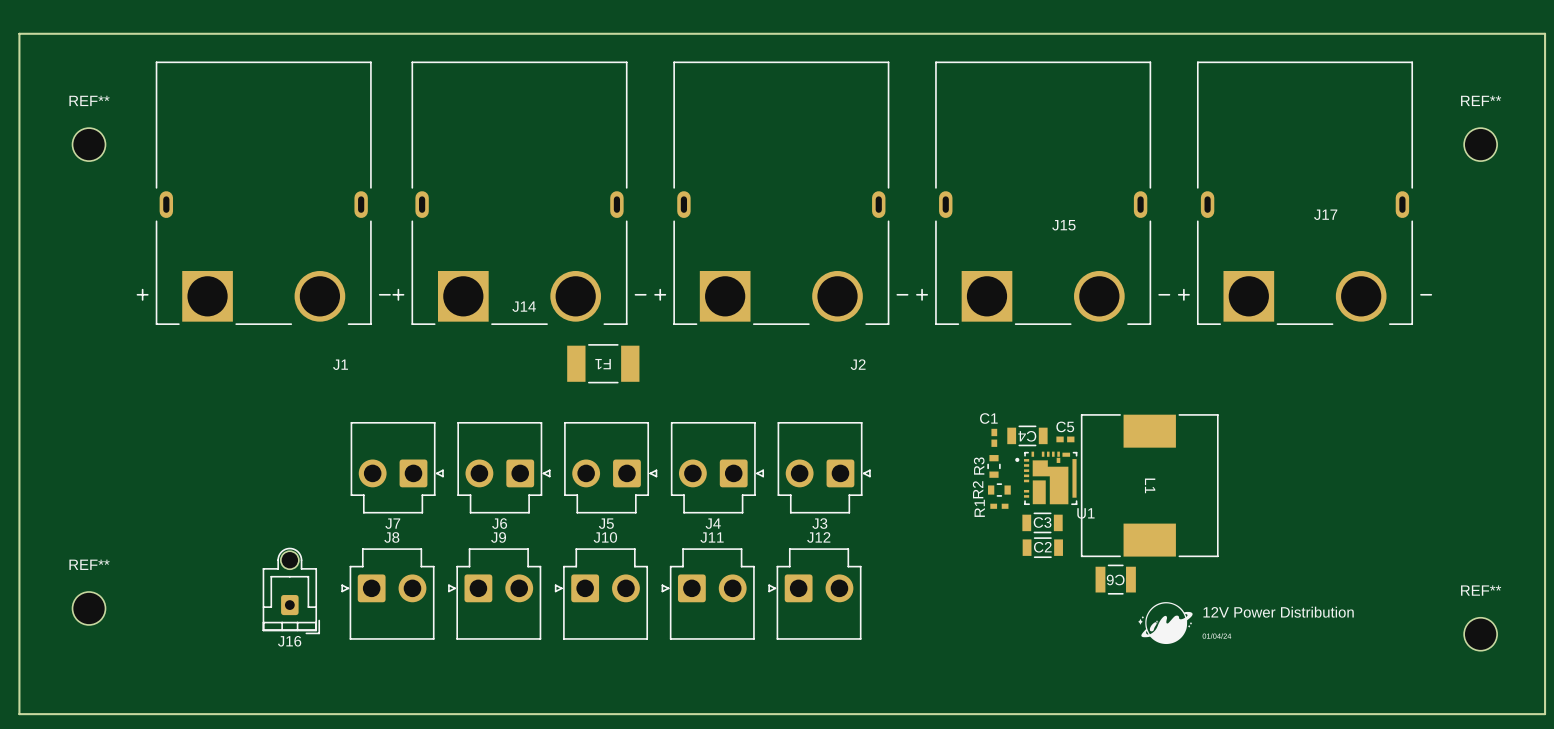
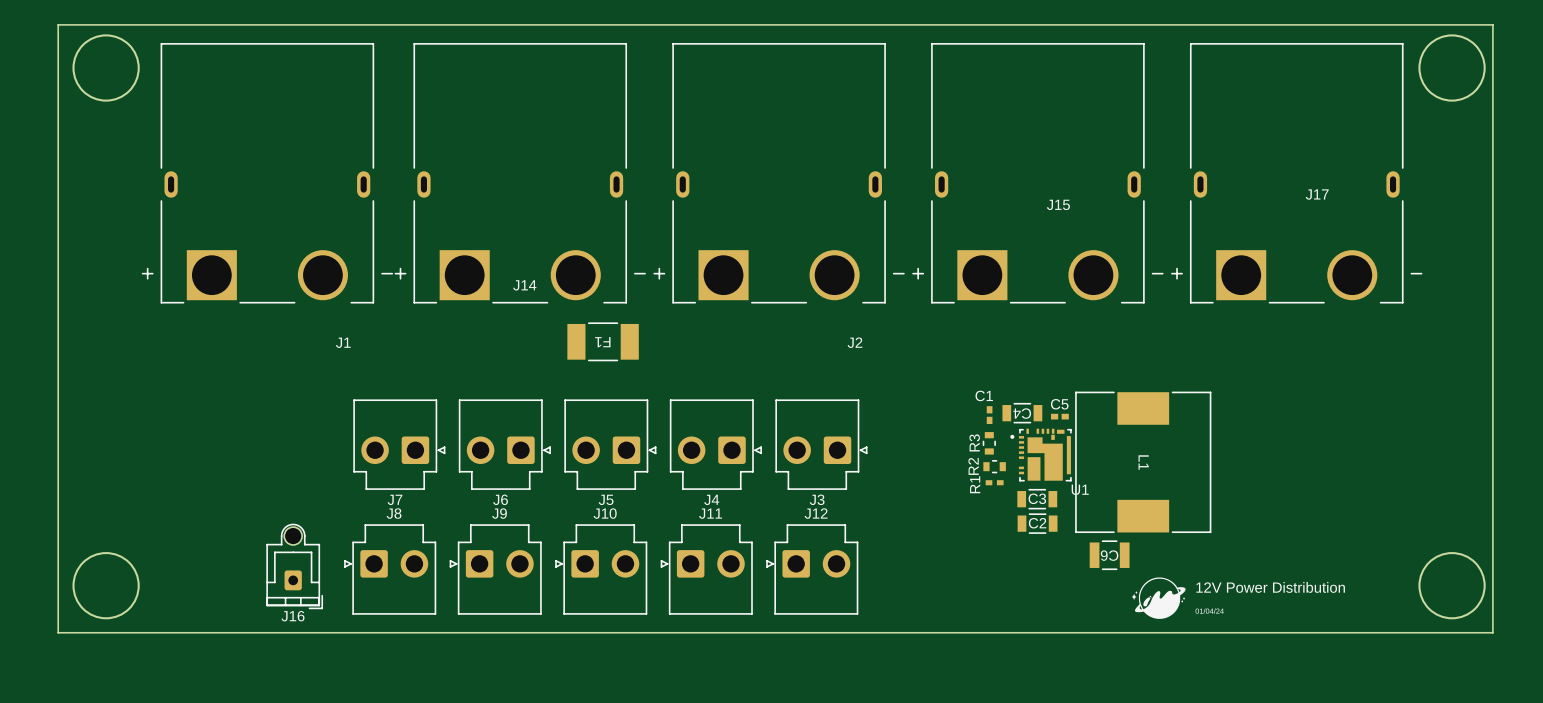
board edge: (19, 33) (1545, 33) (1545, 714) (19, 714) (19, 33) -> (58, 24) (58, 632) (1492, 632) (1492, 24) (58, 24)
round board edge: none -> [72, 34, 140, 102]
round board edge: none -> [1418, 34, 1486, 102]
REF**: (89, 144) -> none
REF**: (1480, 144) -> none
round board edge: none -> [72, 552, 140, 620]
round board edge: none -> [1418, 552, 1486, 620]
REF**: (89, 608) -> none
REF**: (1480, 634) -> none

